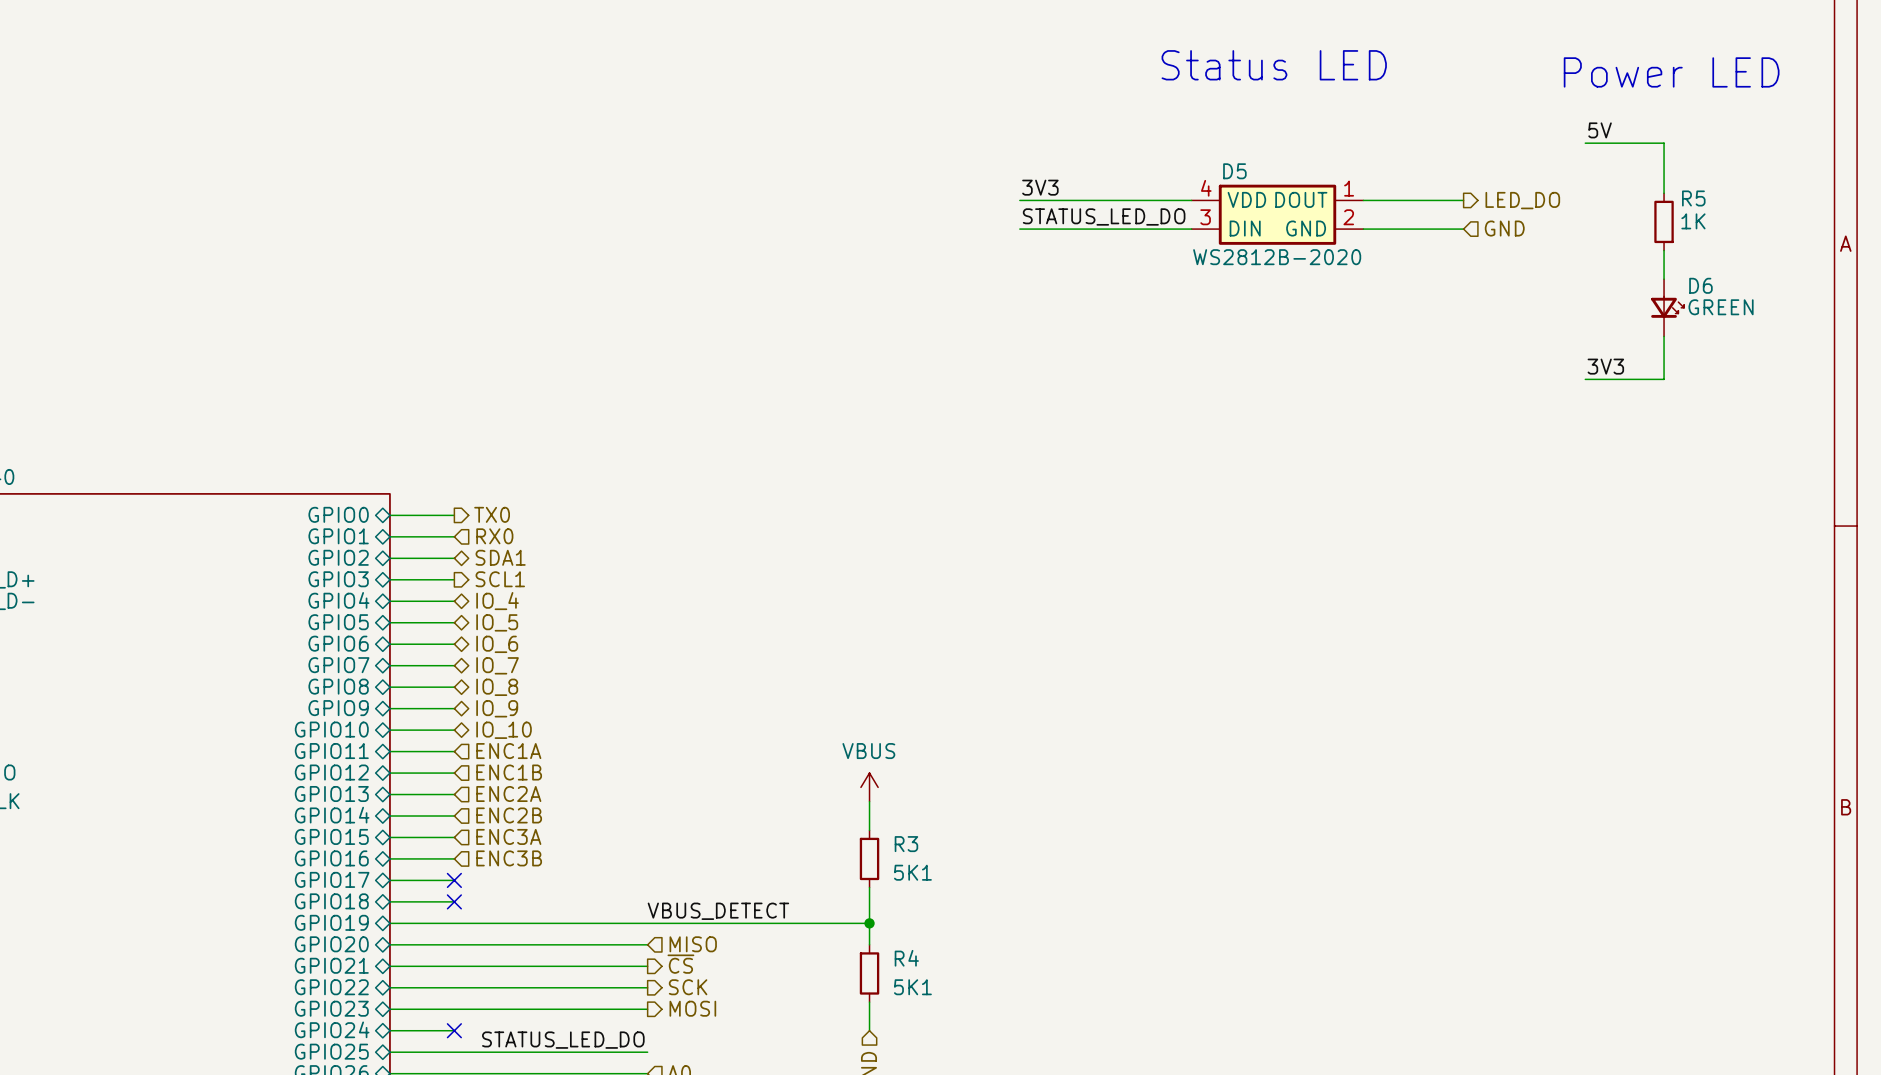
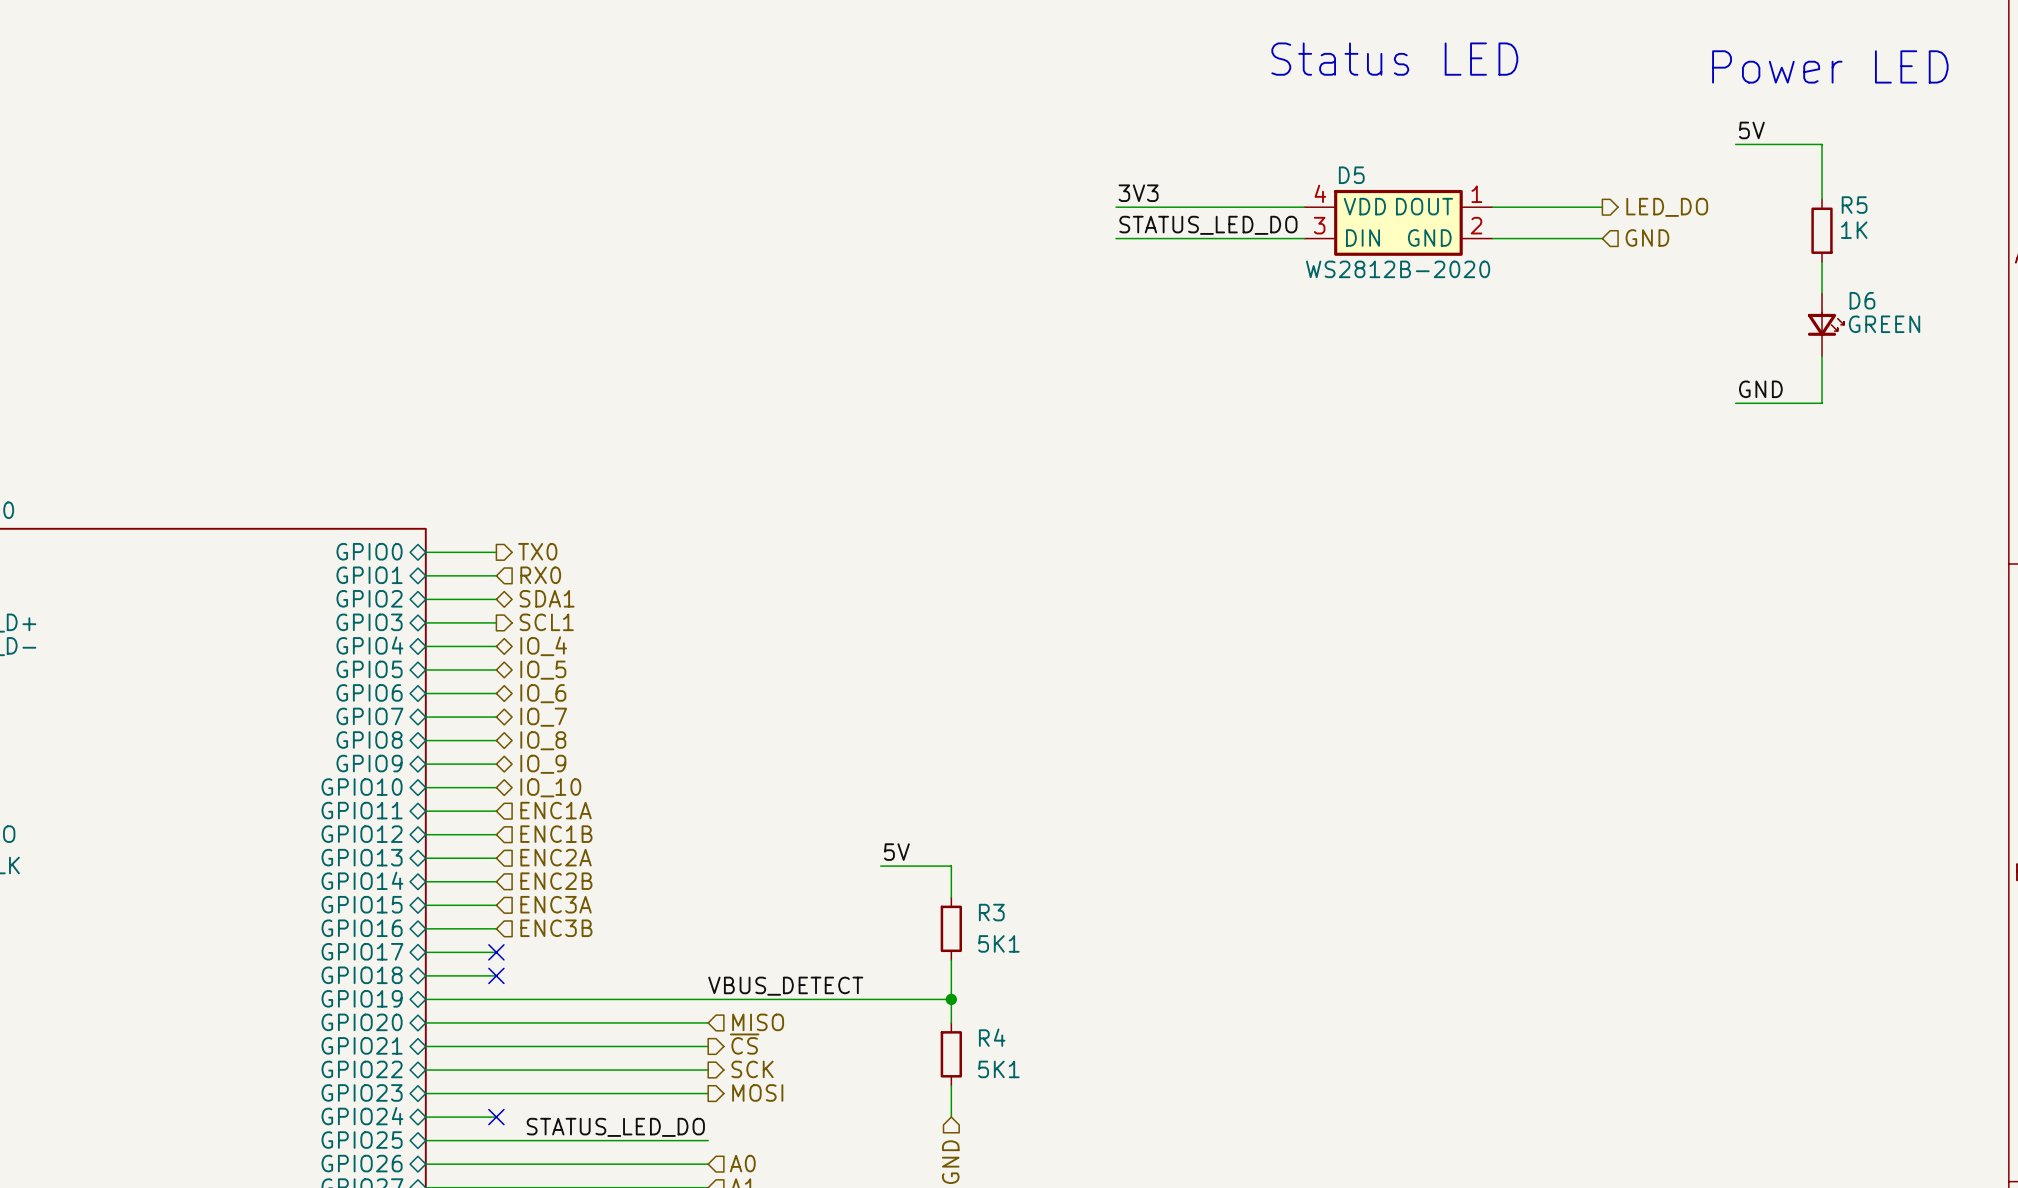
label: 3V3 (1605, 366) -> GND (1760, 389)
power symbol: VBUS (869, 787) -> none
label: none -> 5V (896, 852)
wire: none -> (880, 866) (951, 866)

